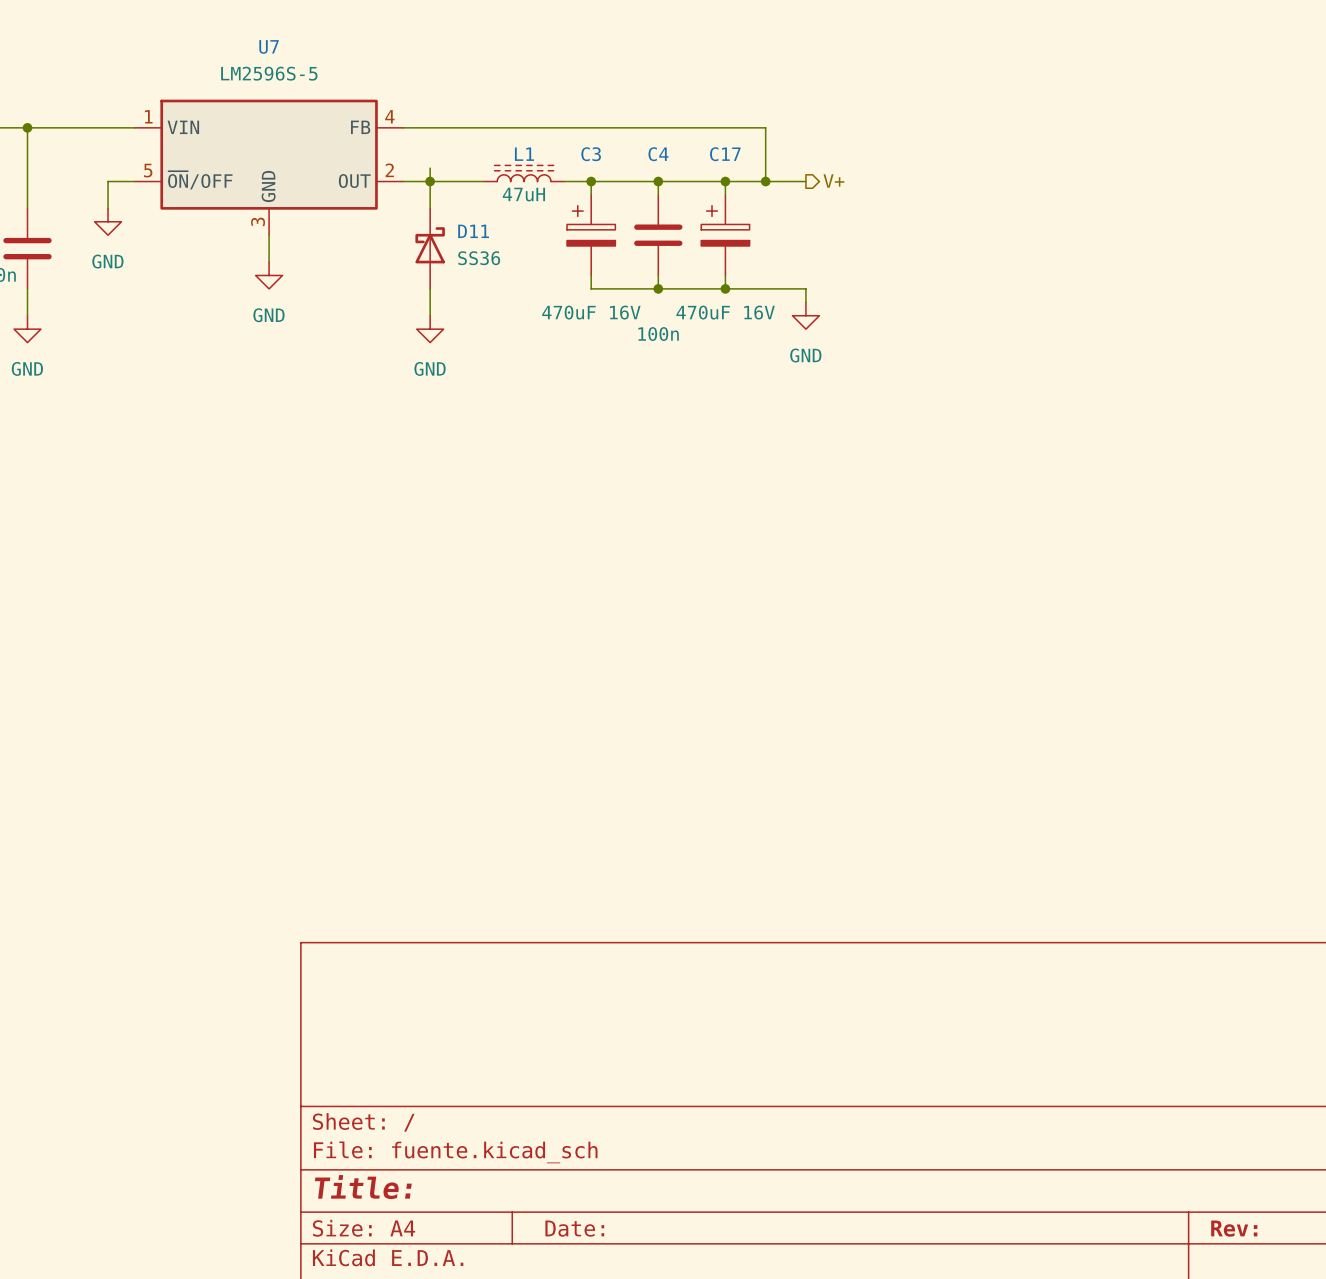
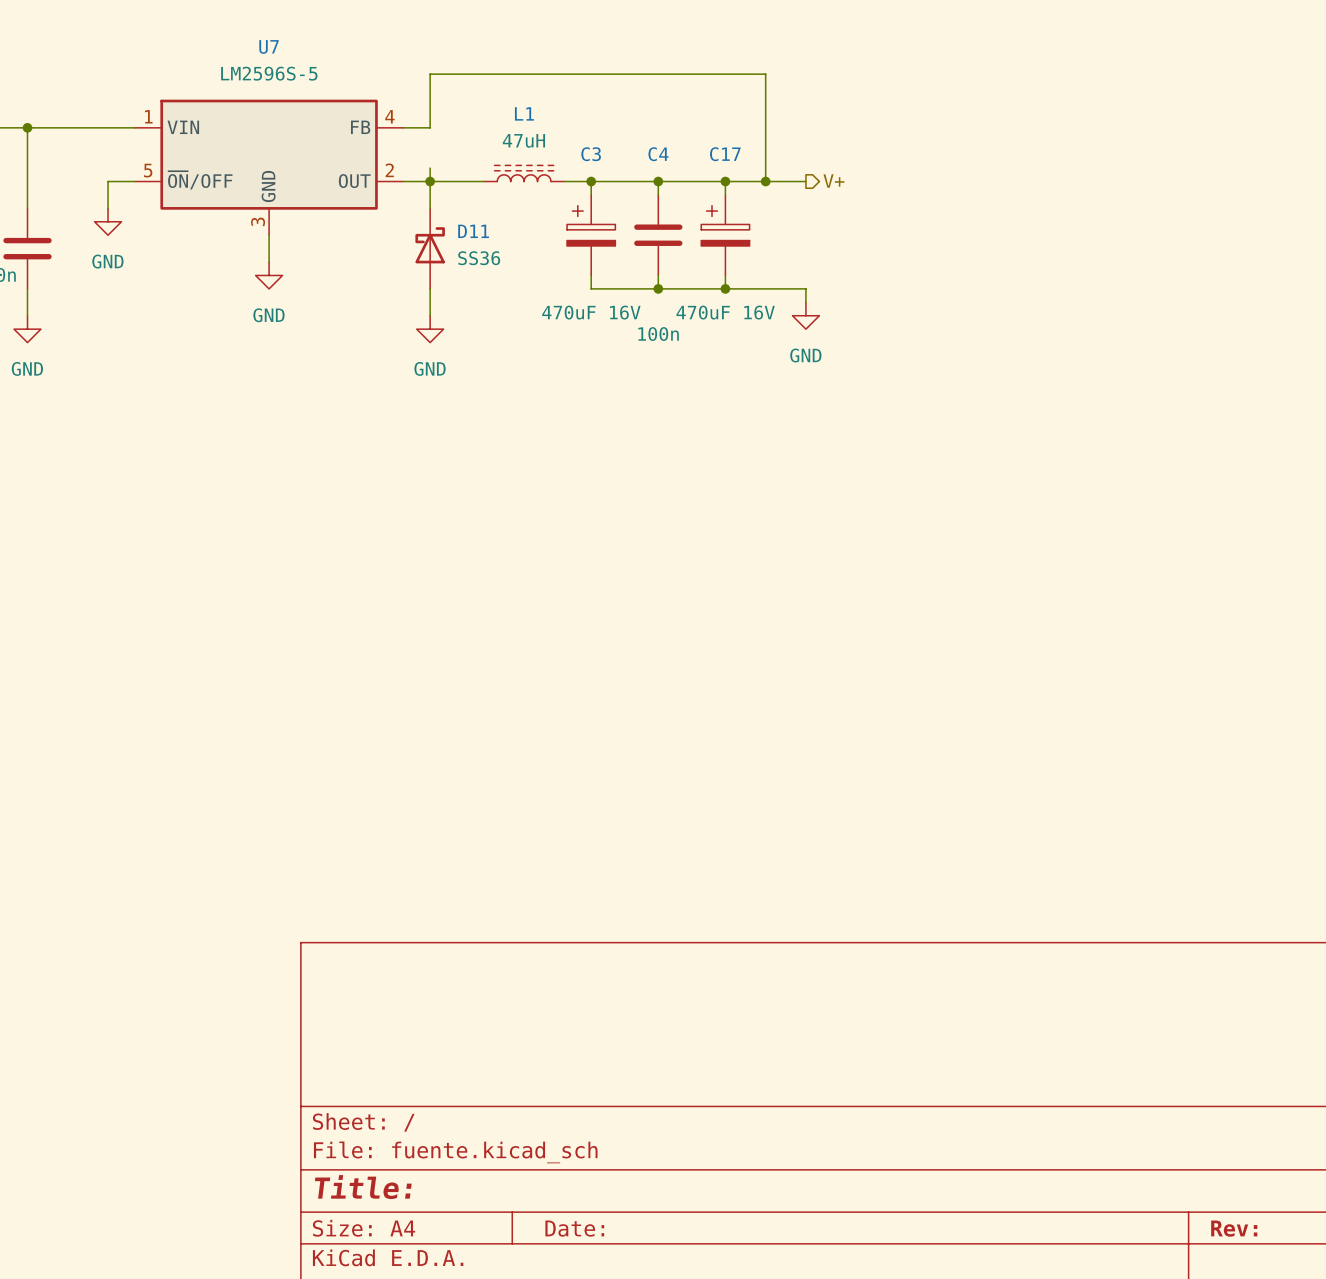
wire: (430, 127) (765, 127) -> (430, 127) (430, 74) (765, 74) (765, 127)
L1 name position: L1 (524, 154) -> L1 (524, 113)
L1 value position: 47uH (523, 194) -> 47uH (523, 140)

